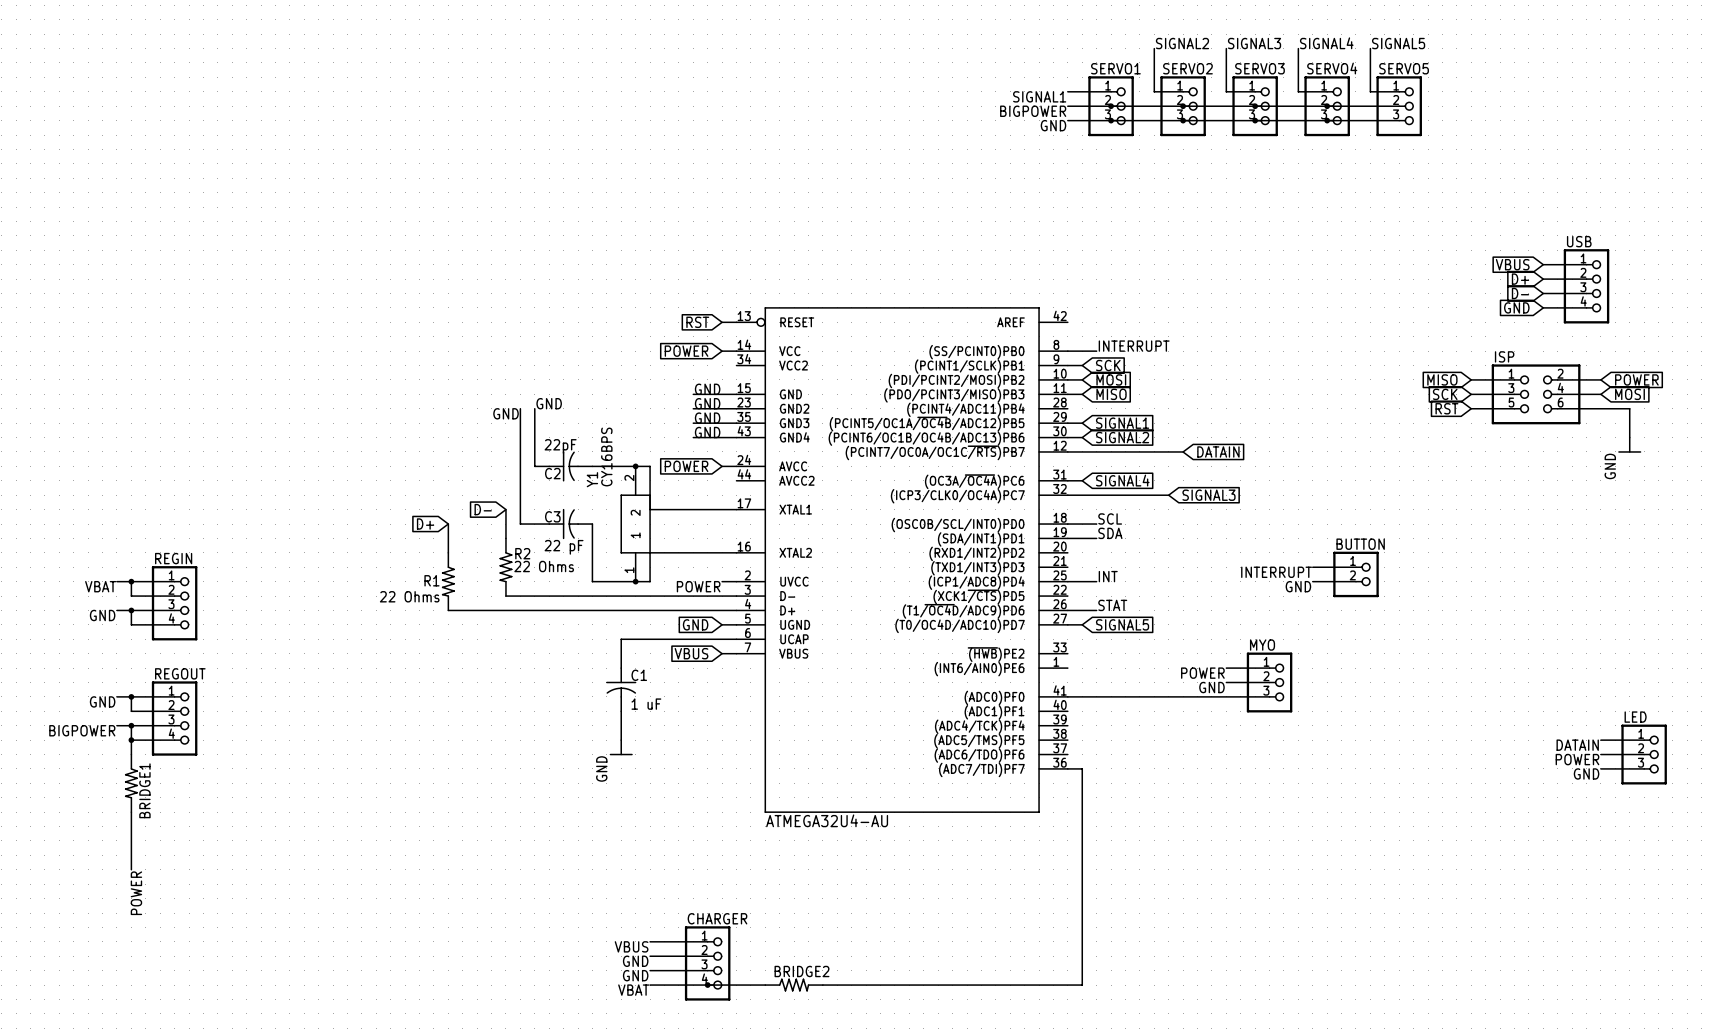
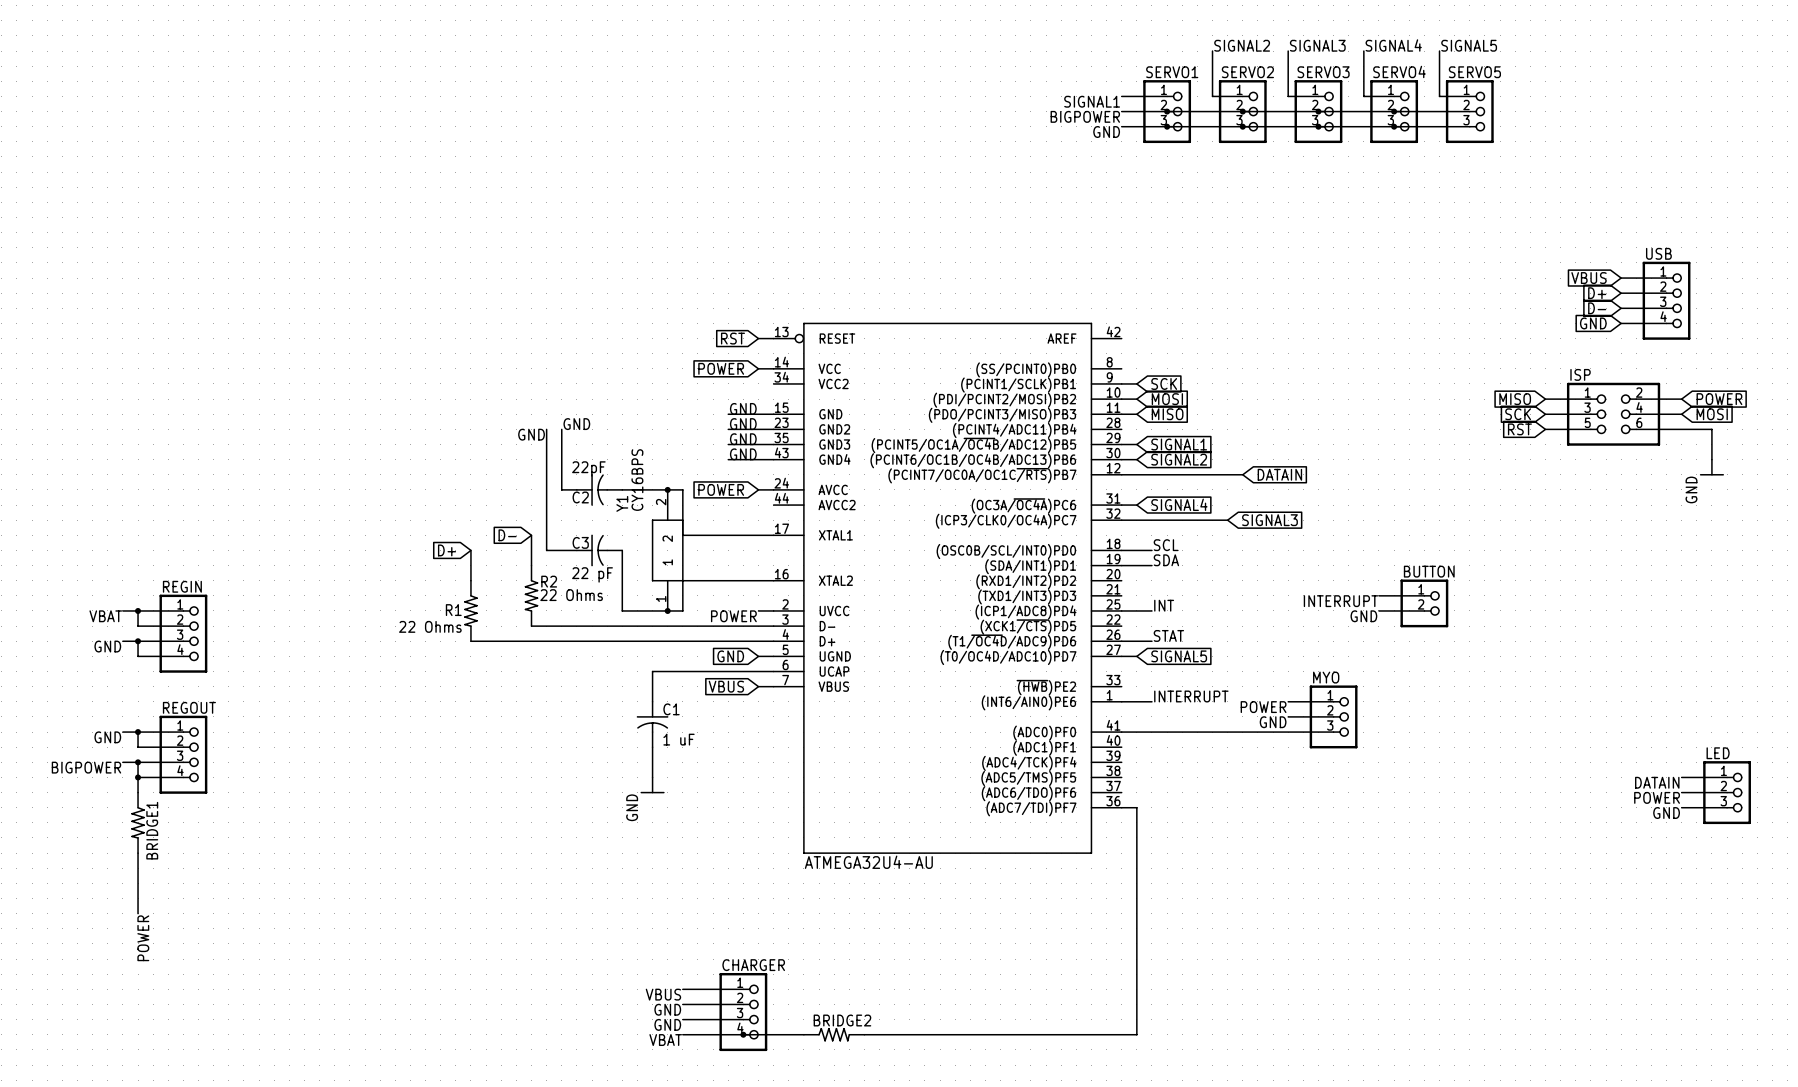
label: INTERRUPT (1134, 346) -> none
wire: (1067, 351) (1096, 351) -> none
label: none -> INTERRUPT (1191, 696)
wire: none -> (1121, 701) (1151, 701)

